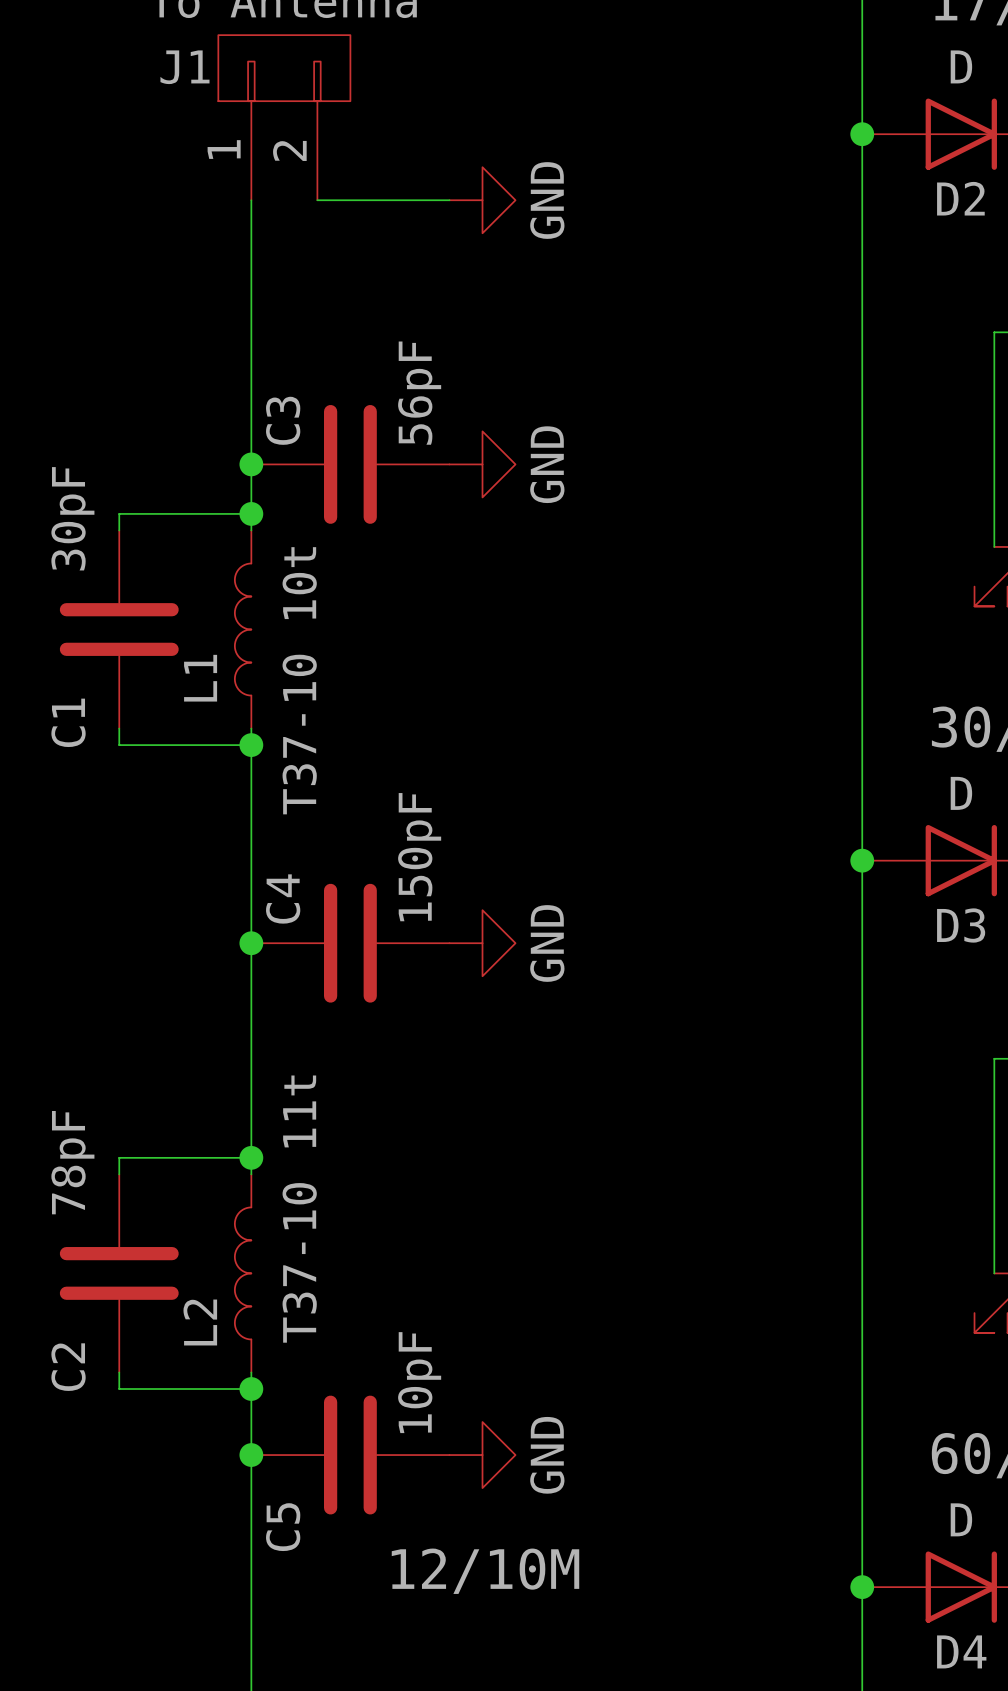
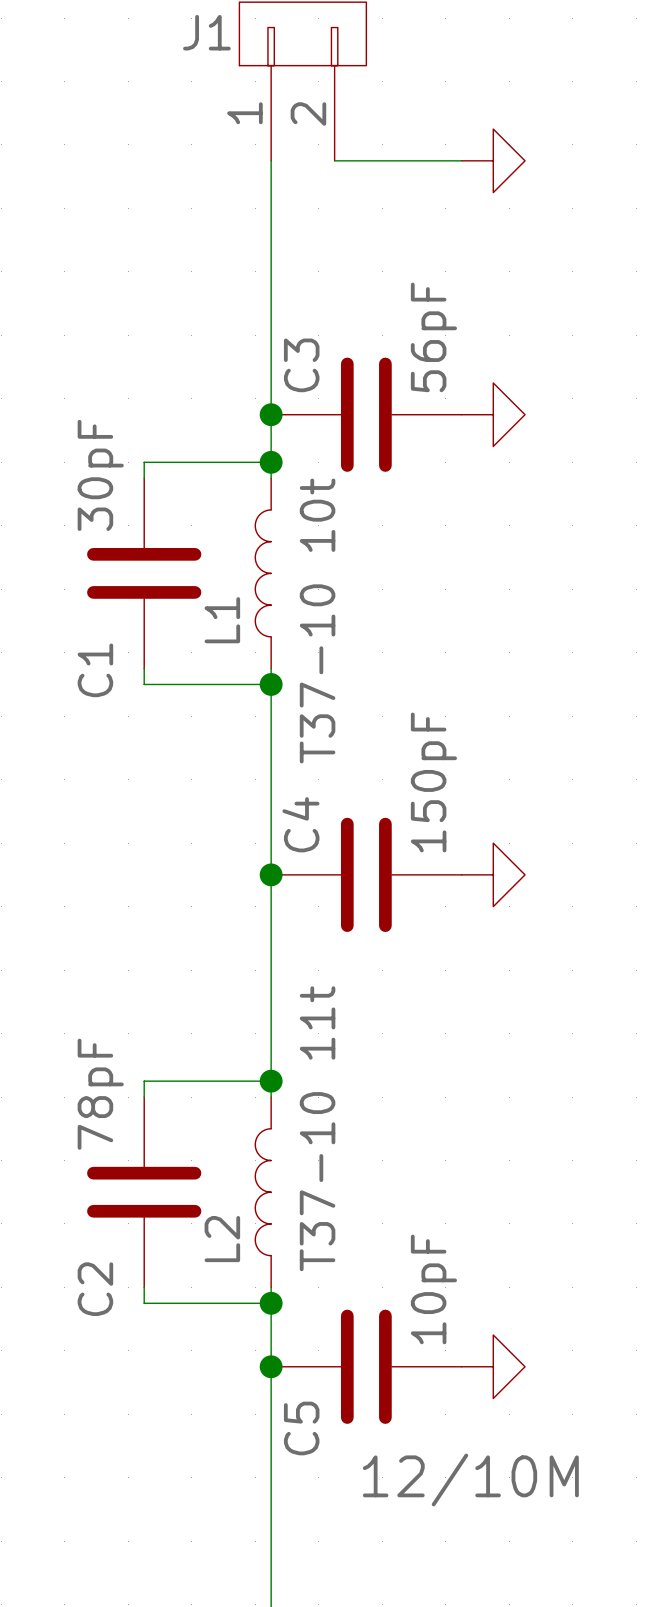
power symbol text: GND (547, 200) -> none
power symbol text: GND (547, 464) -> none
power symbol text: GND (547, 943) -> none
power symbol text: GND (547, 1455) -> none

